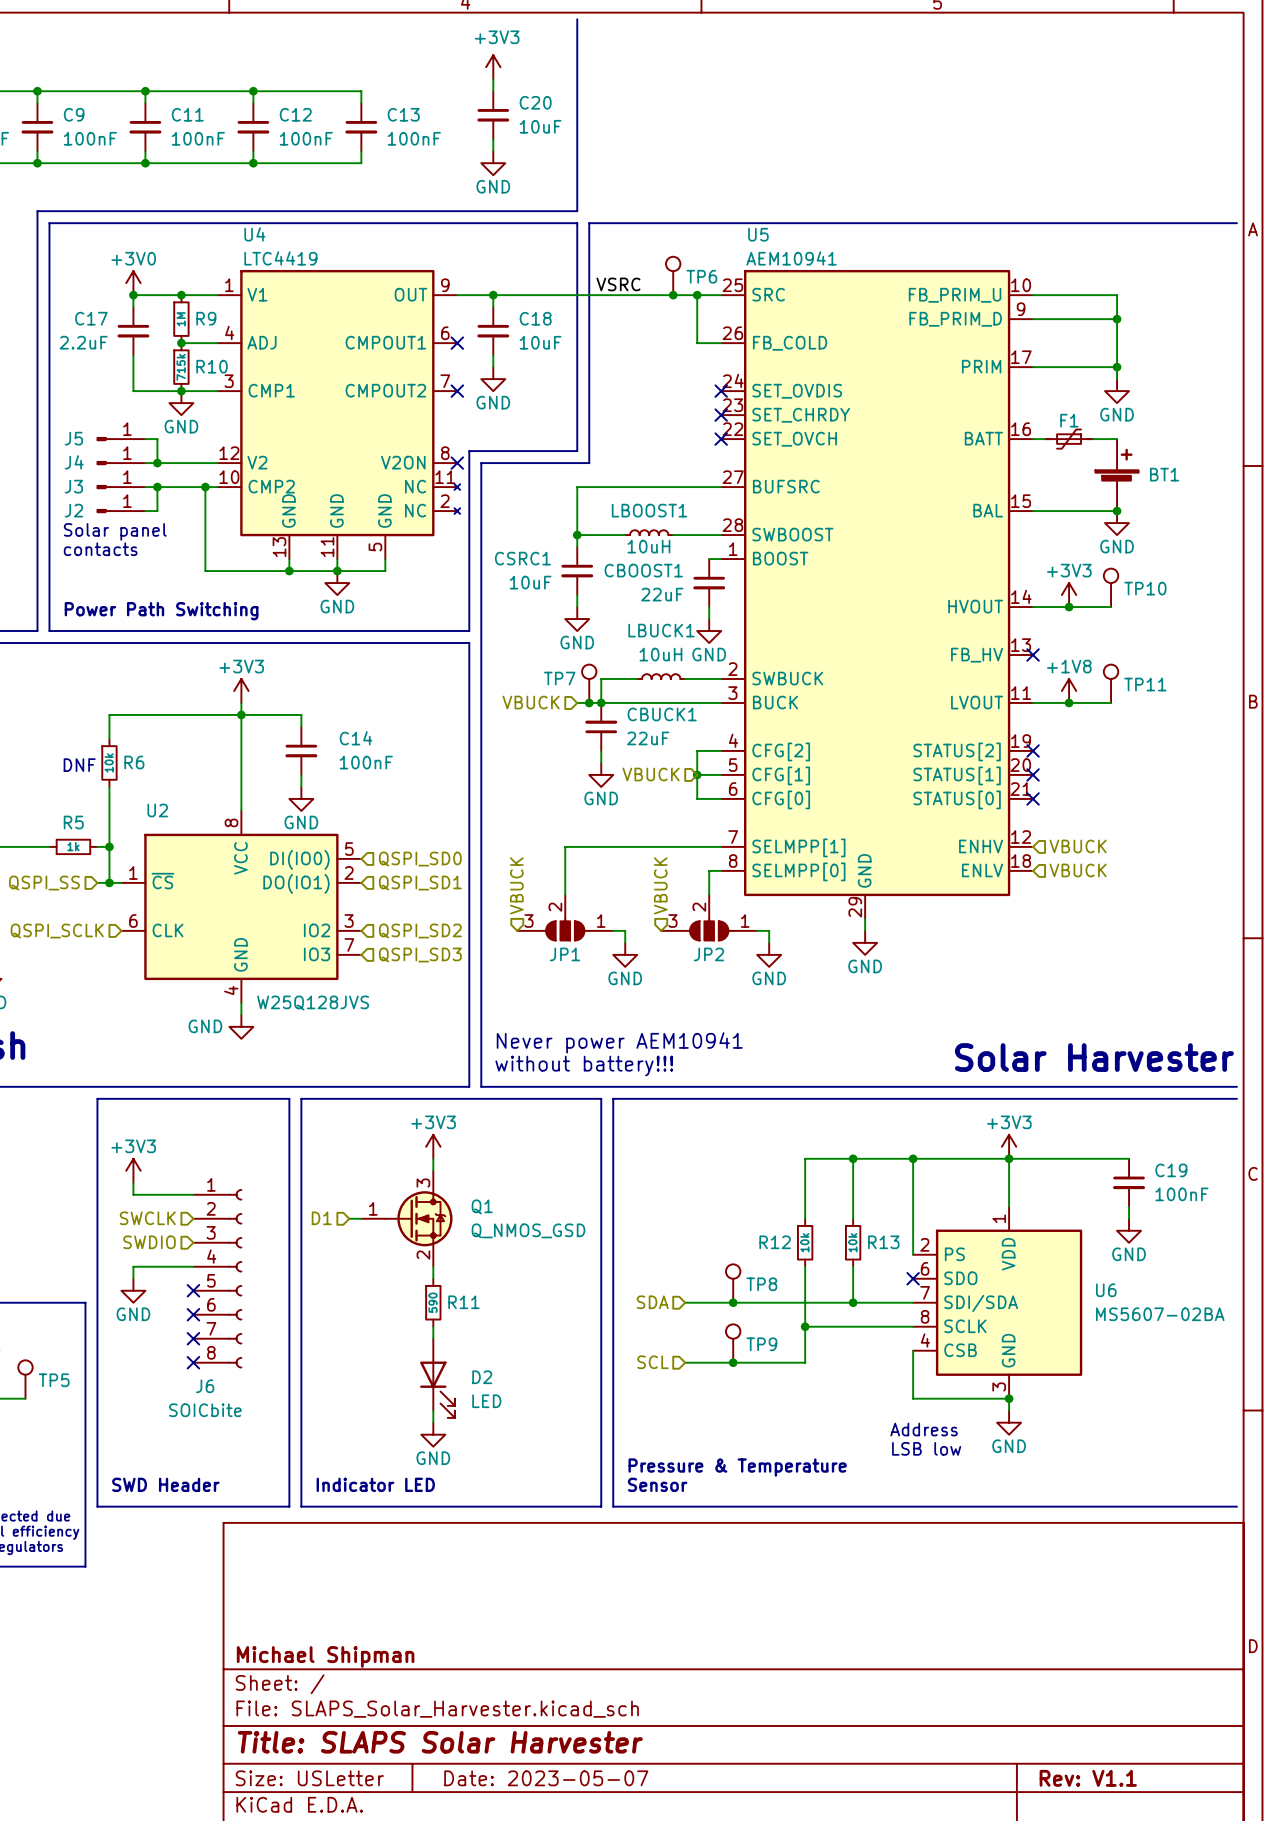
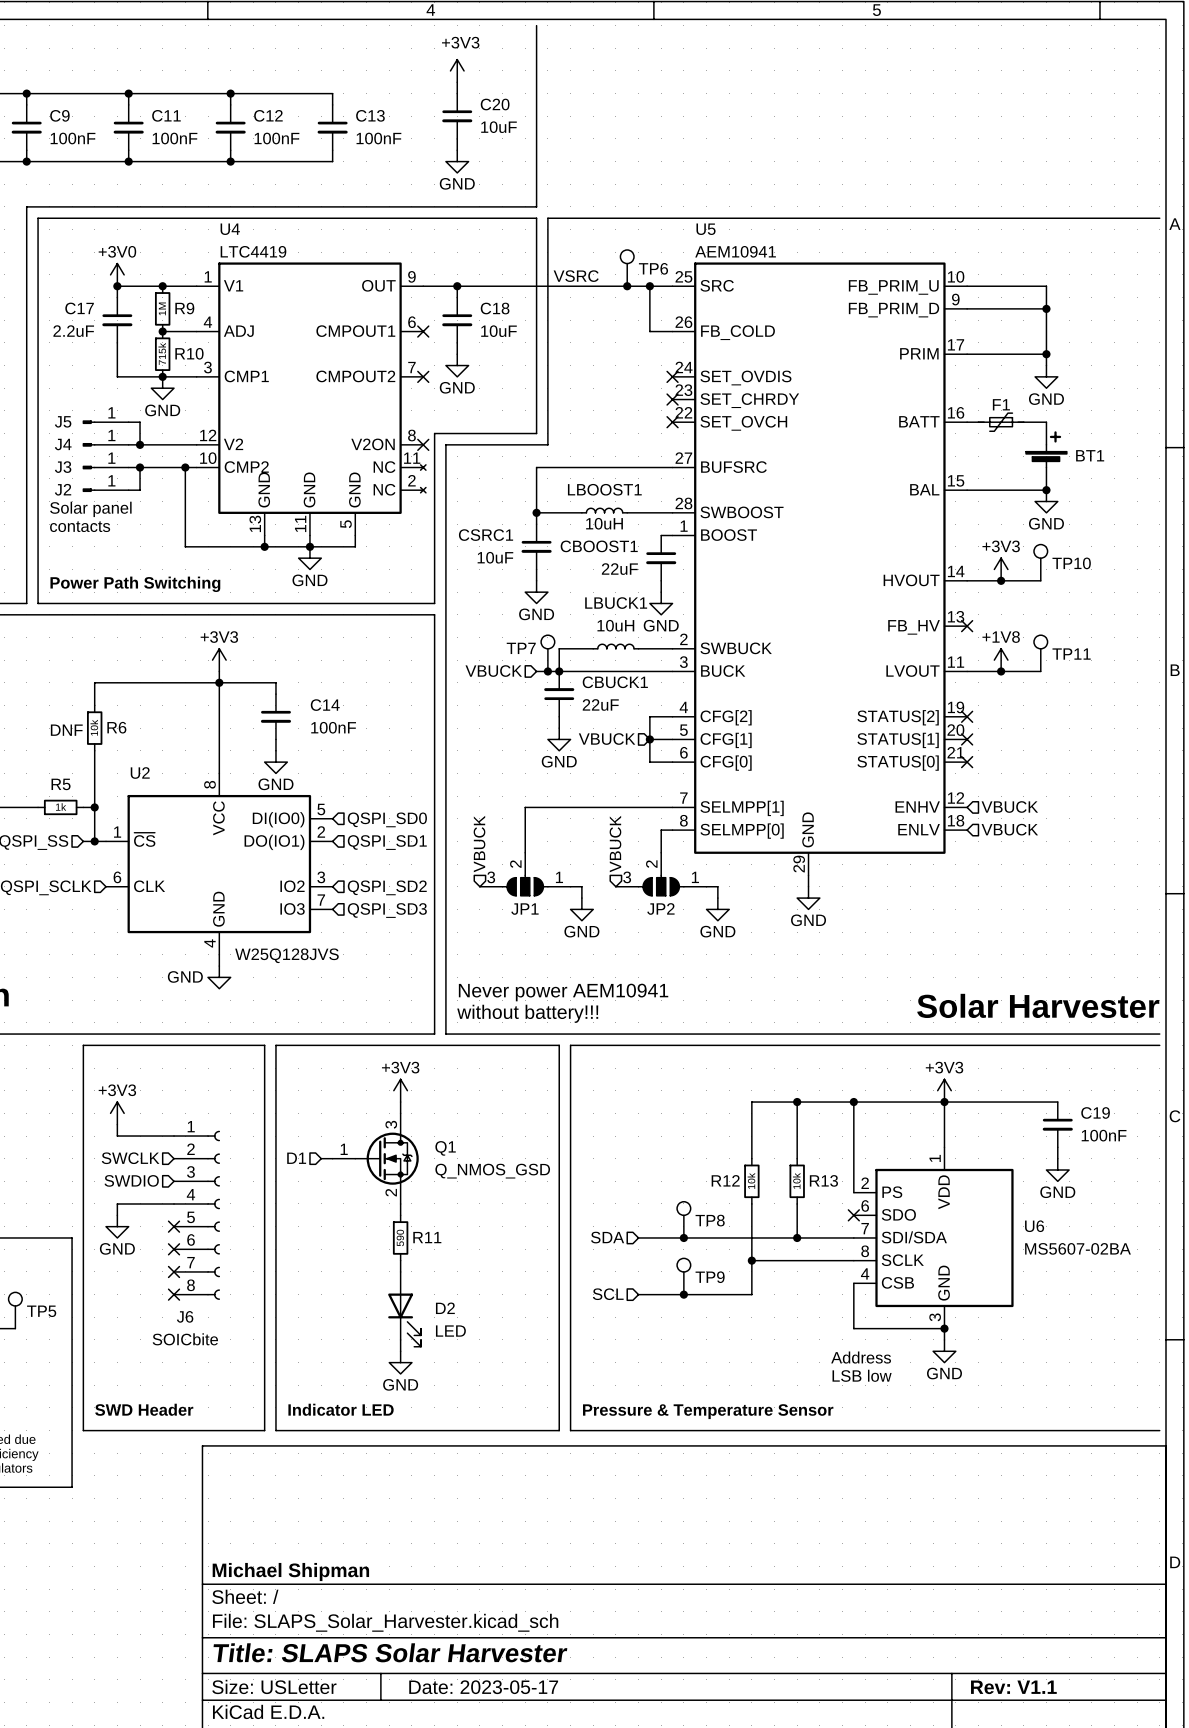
text: Pressure & Temperature (737, 1467) -> none
text: Sensor (657, 1484) -> Pressure & Temperature Sensor (708, 1411)
title block: Date: 2023-05-07 (546, 1778) -> Date: 2023-05-17 (483, 1687)

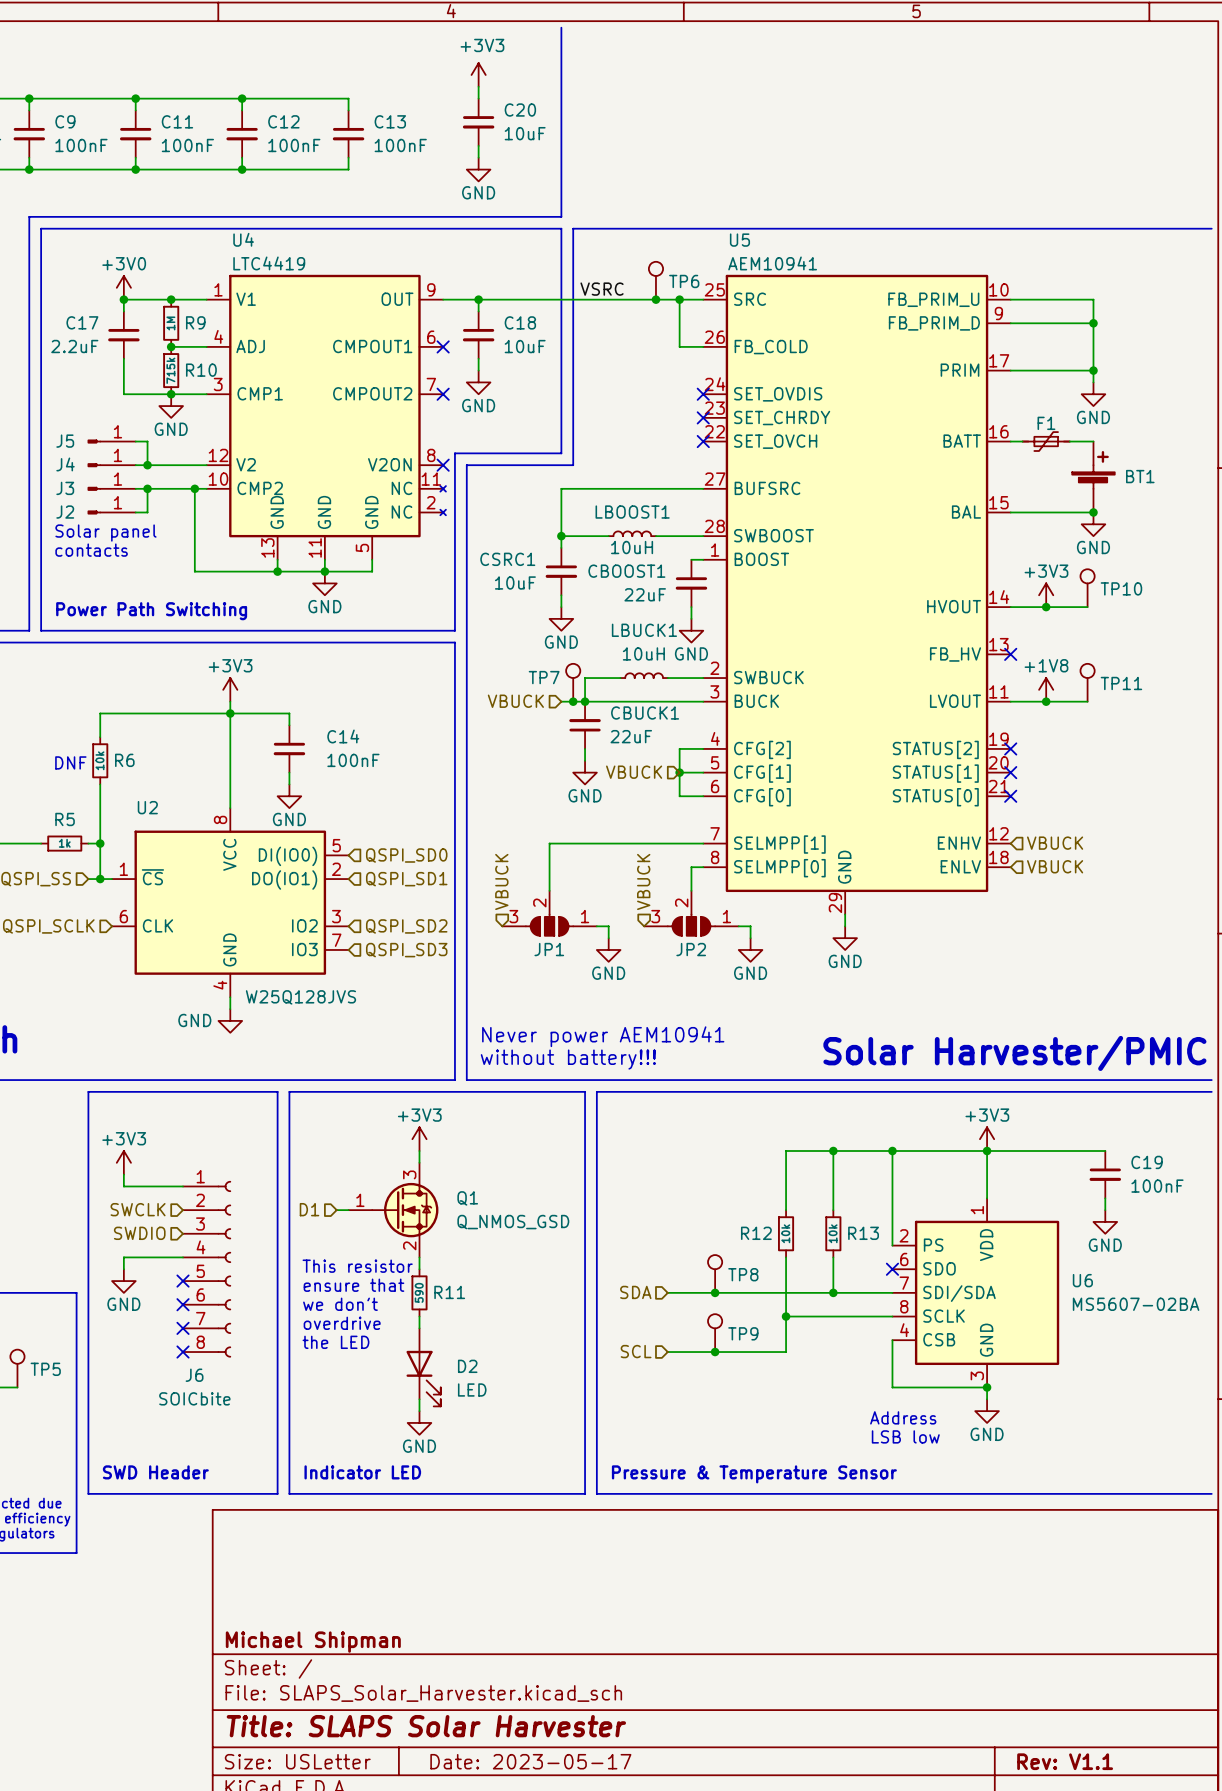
text: Solar Harvester (1038, 1005) -> Solar Harvester/PMIC (1014, 1053)
text: none -> This resistor (357, 1266)
text: none -> ensure that (353, 1285)
text: none -> we don't (340, 1304)
text: none -> overdrive (342, 1323)
text: none -> the LED (335, 1342)

